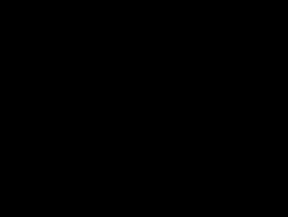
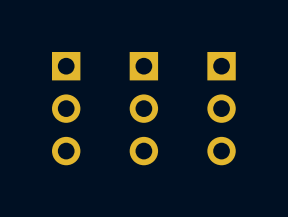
part: none -> (66, 108)
part: none -> (143, 108)
part: none -> (221, 108)

